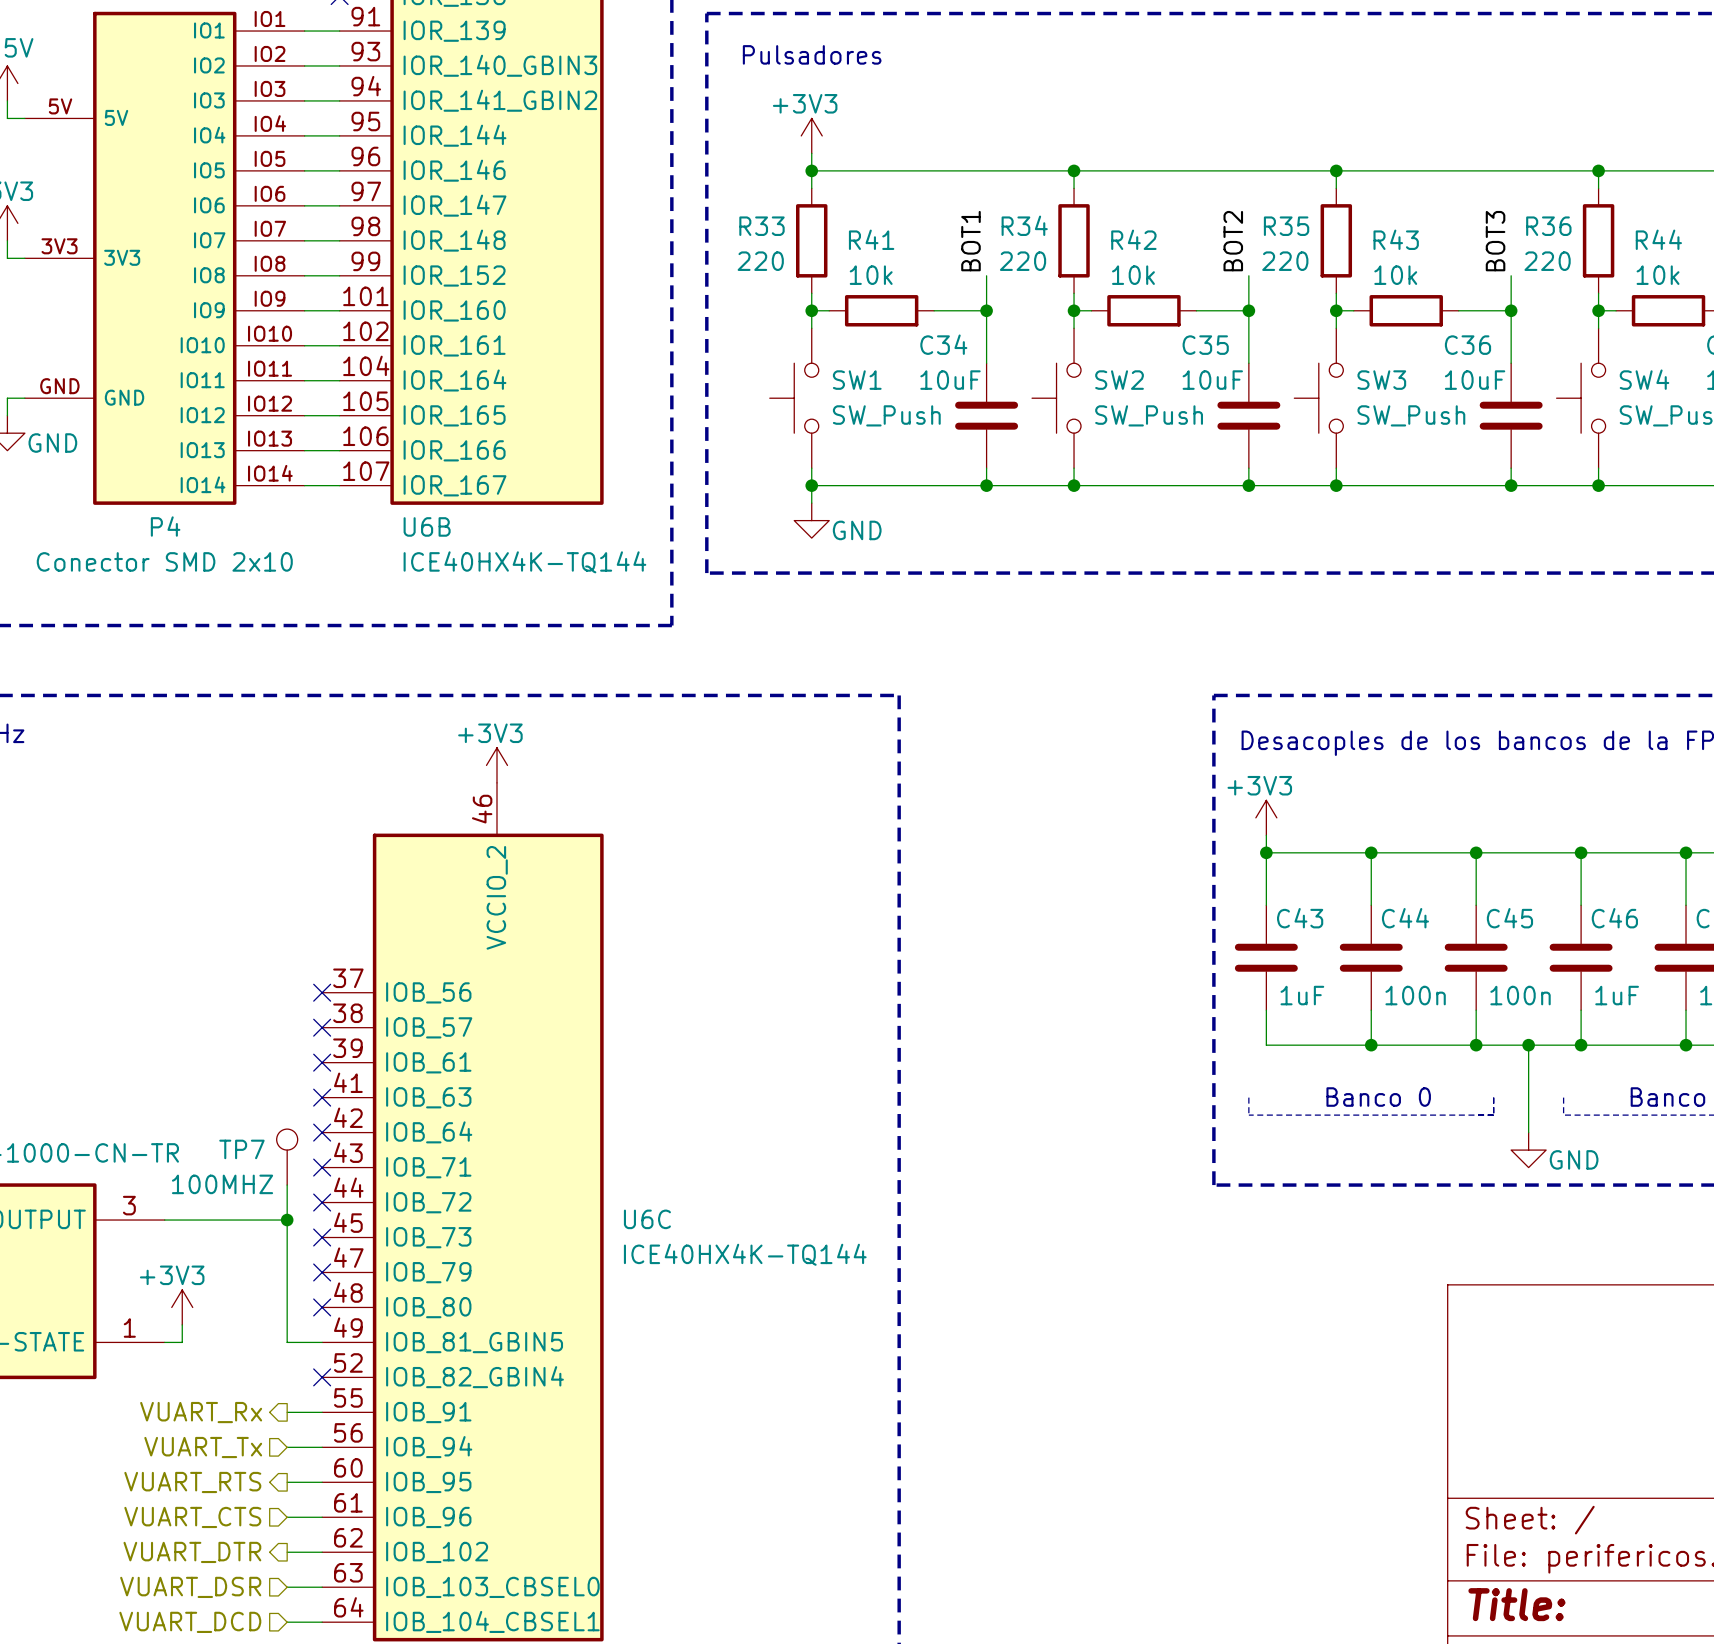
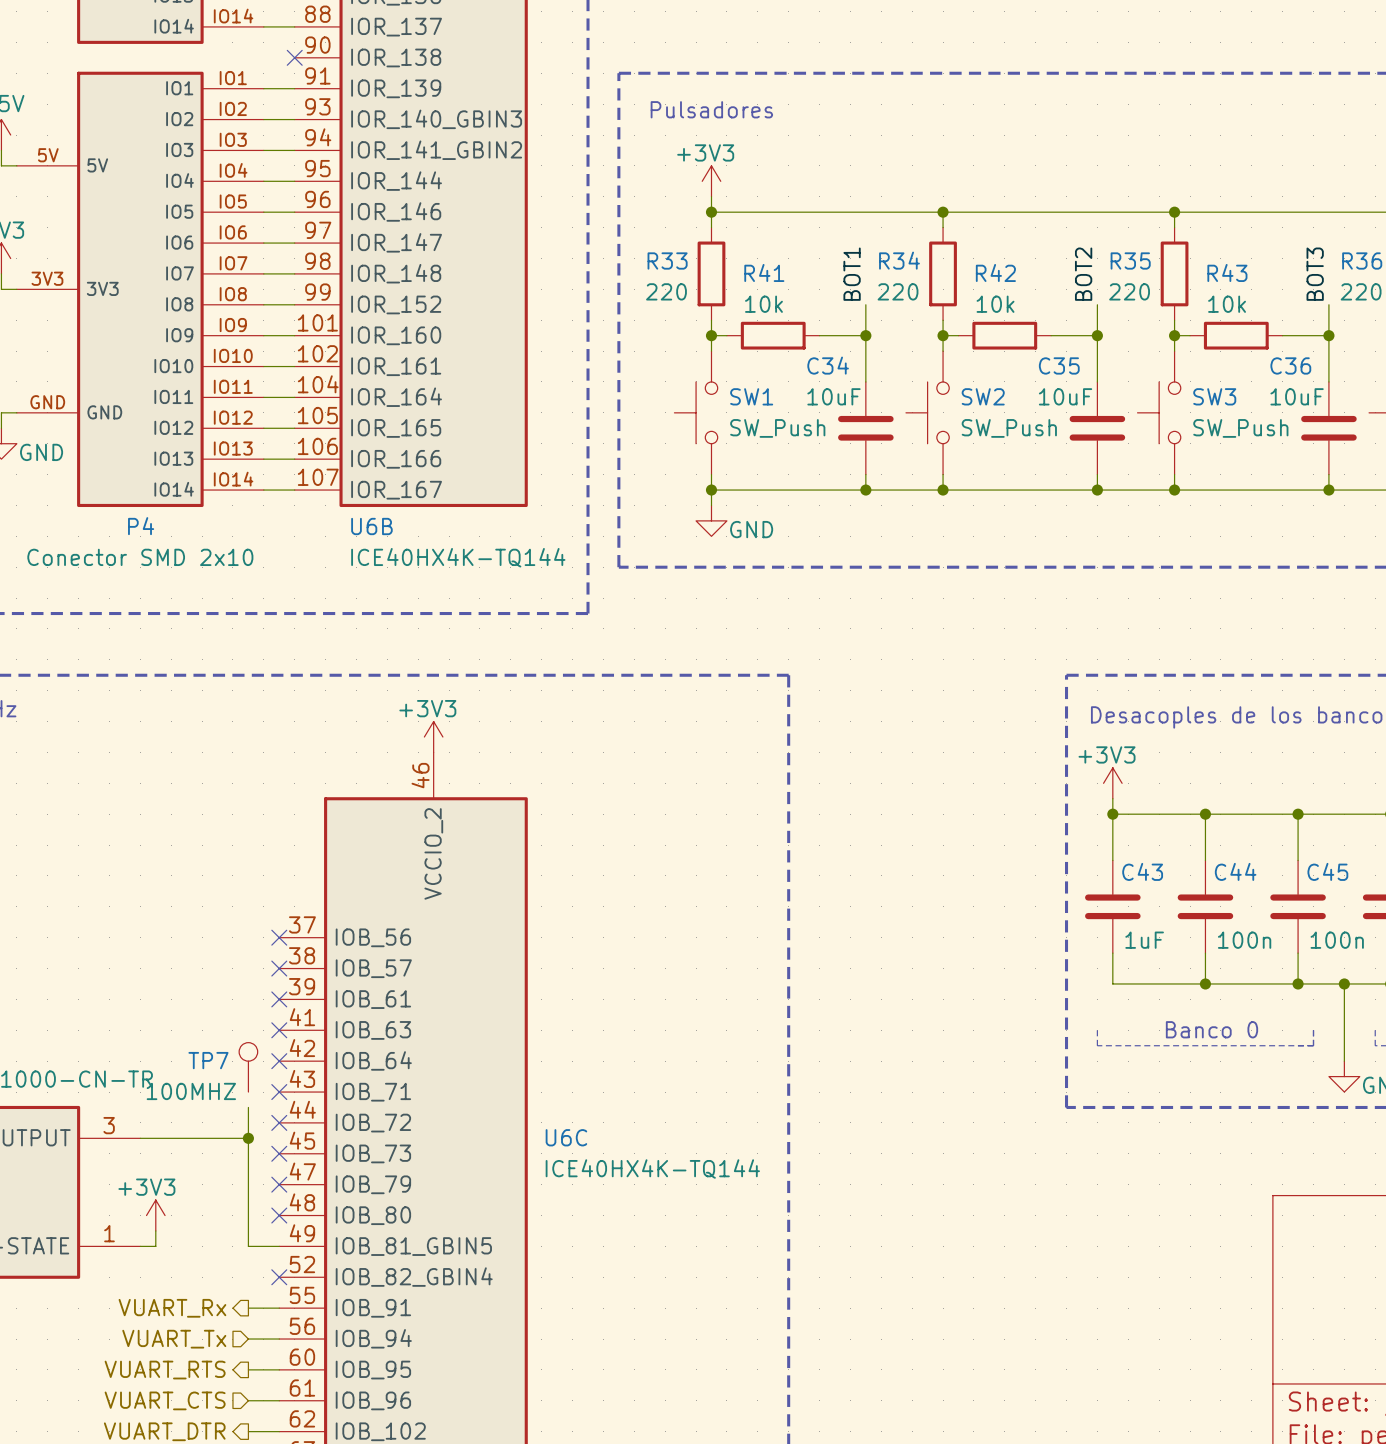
TP7 position: (287, 1157) -> (248, 1067)

